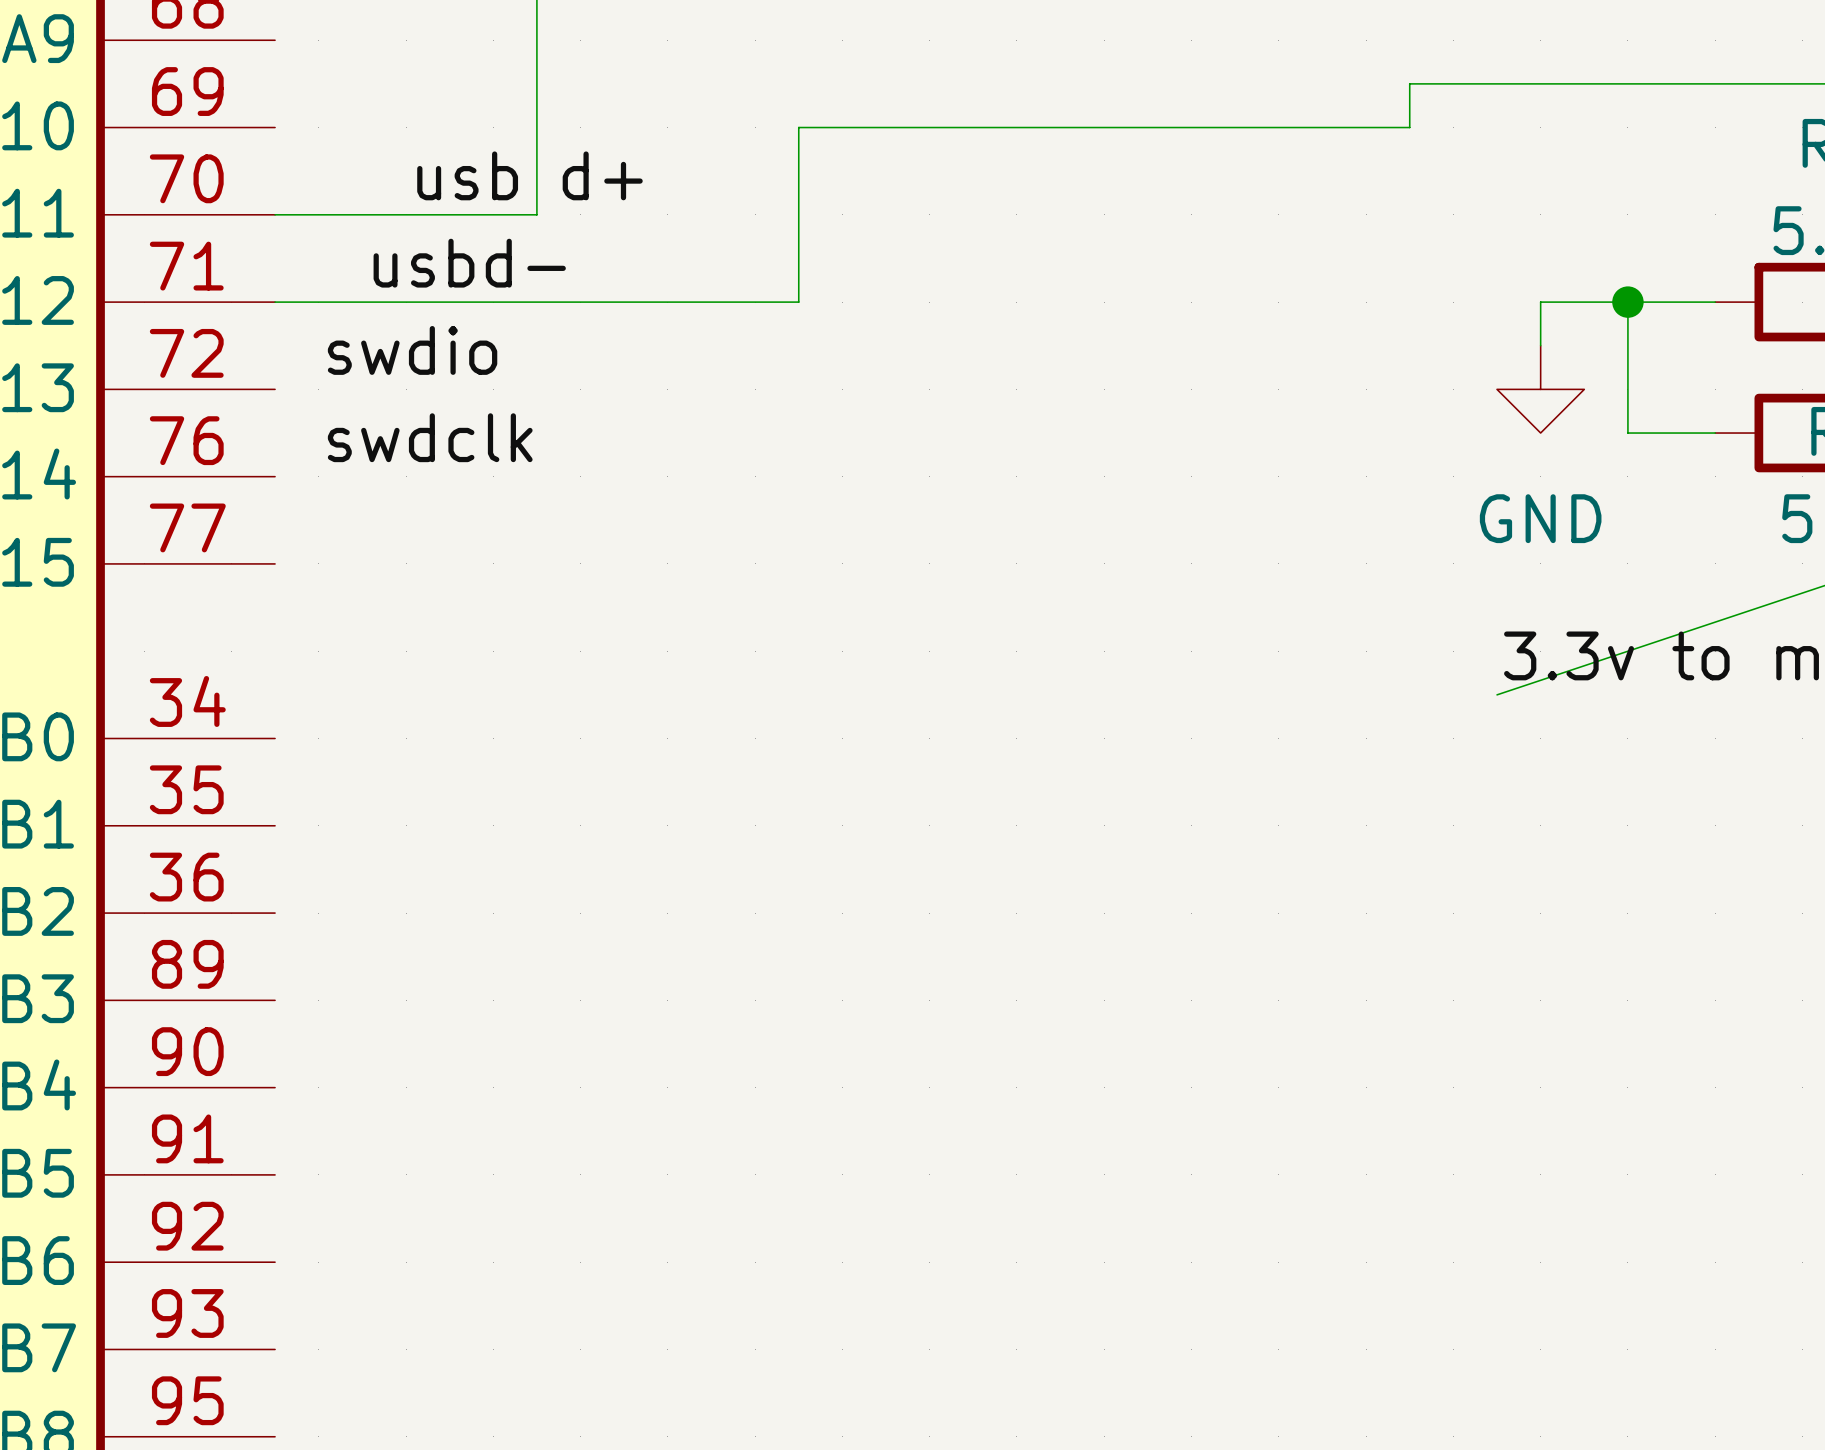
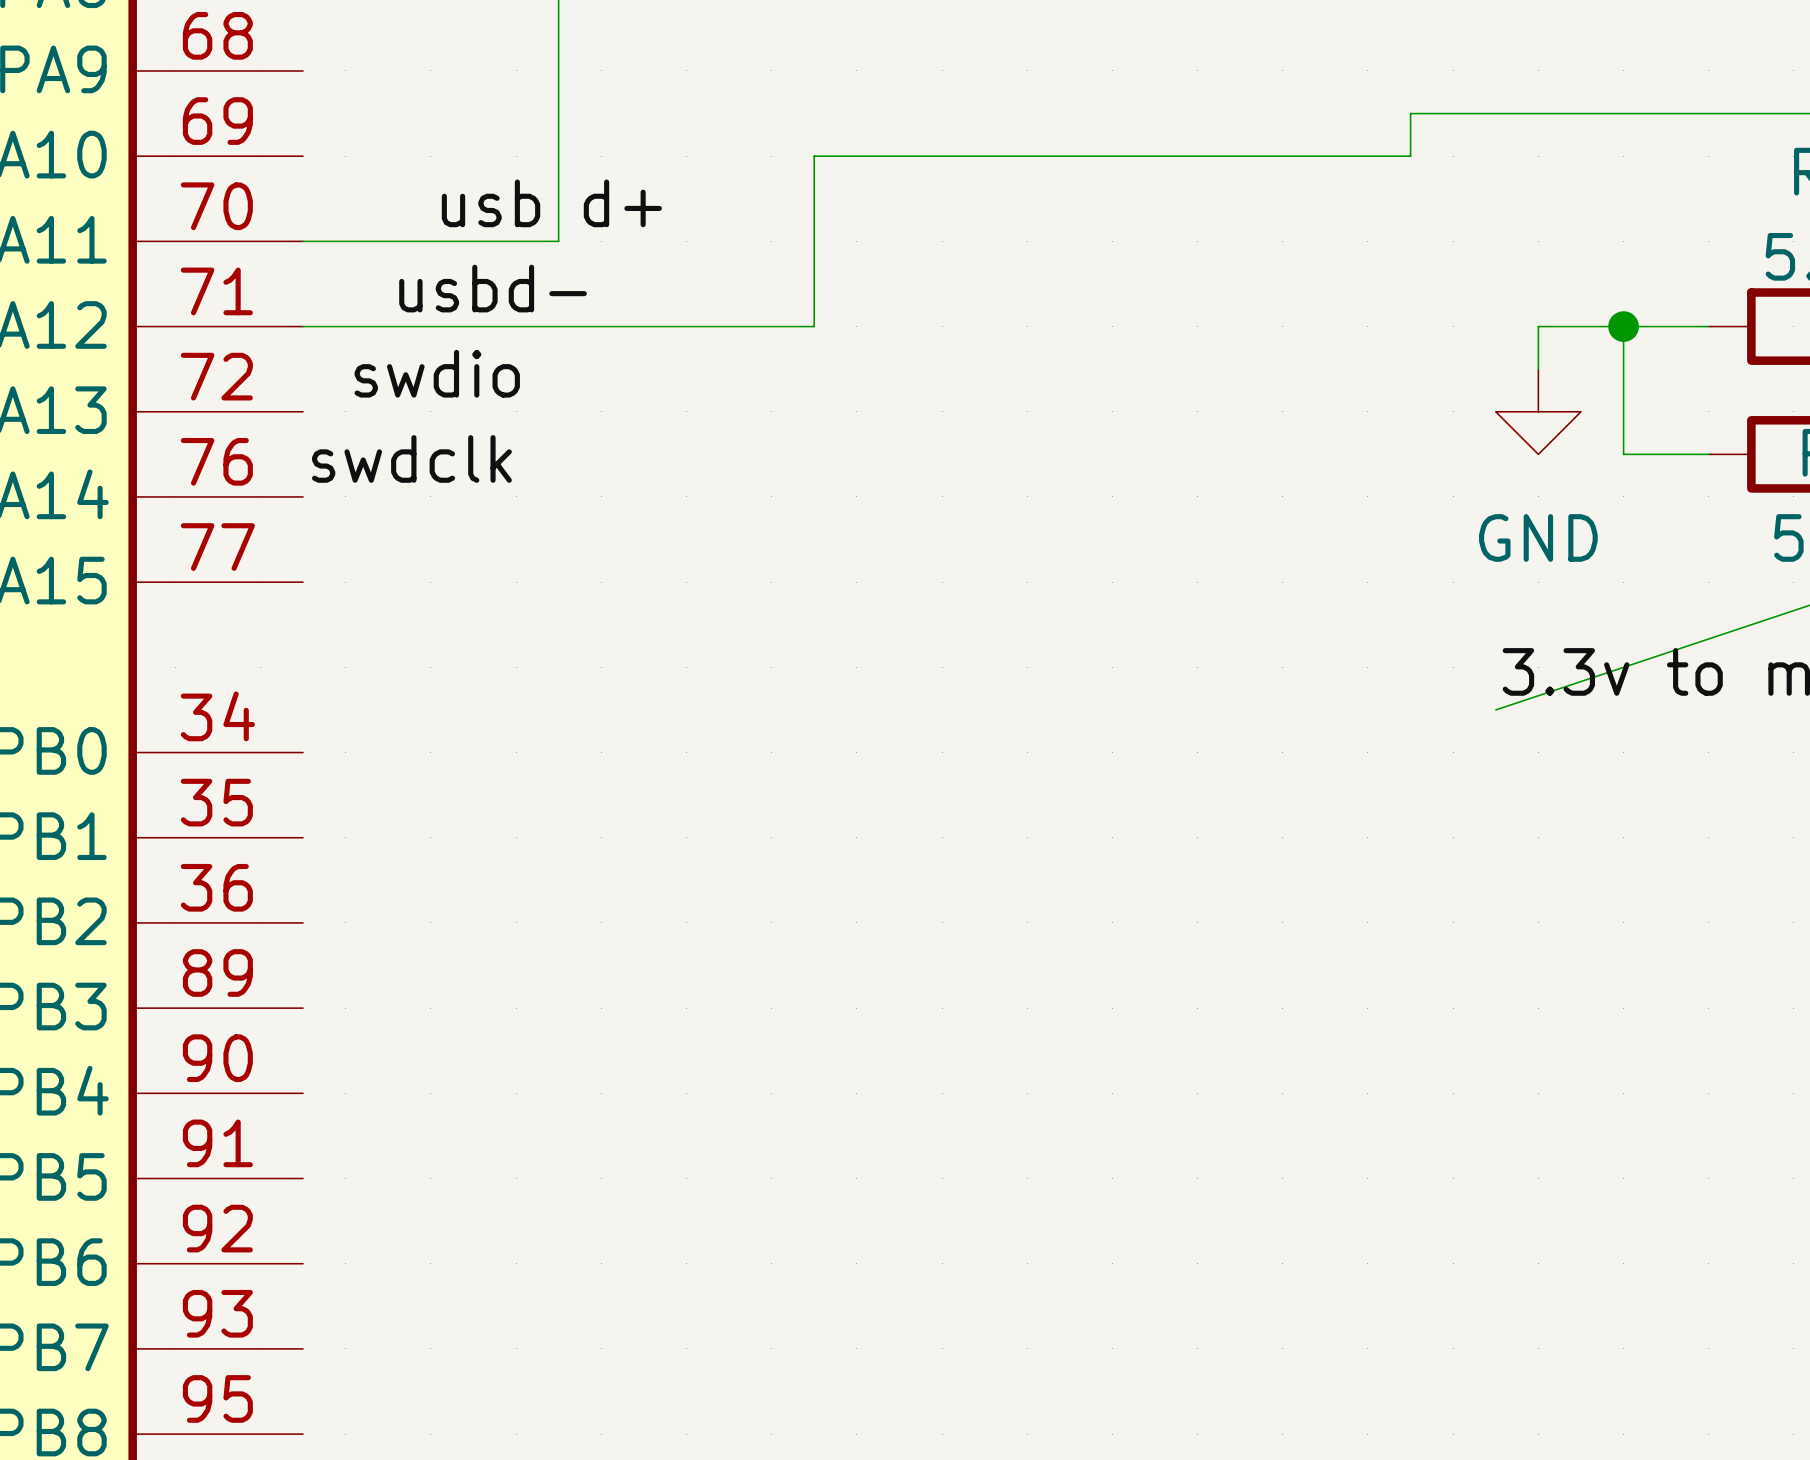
label position: swdclk (430, 437) -> swdclk (411, 458)

